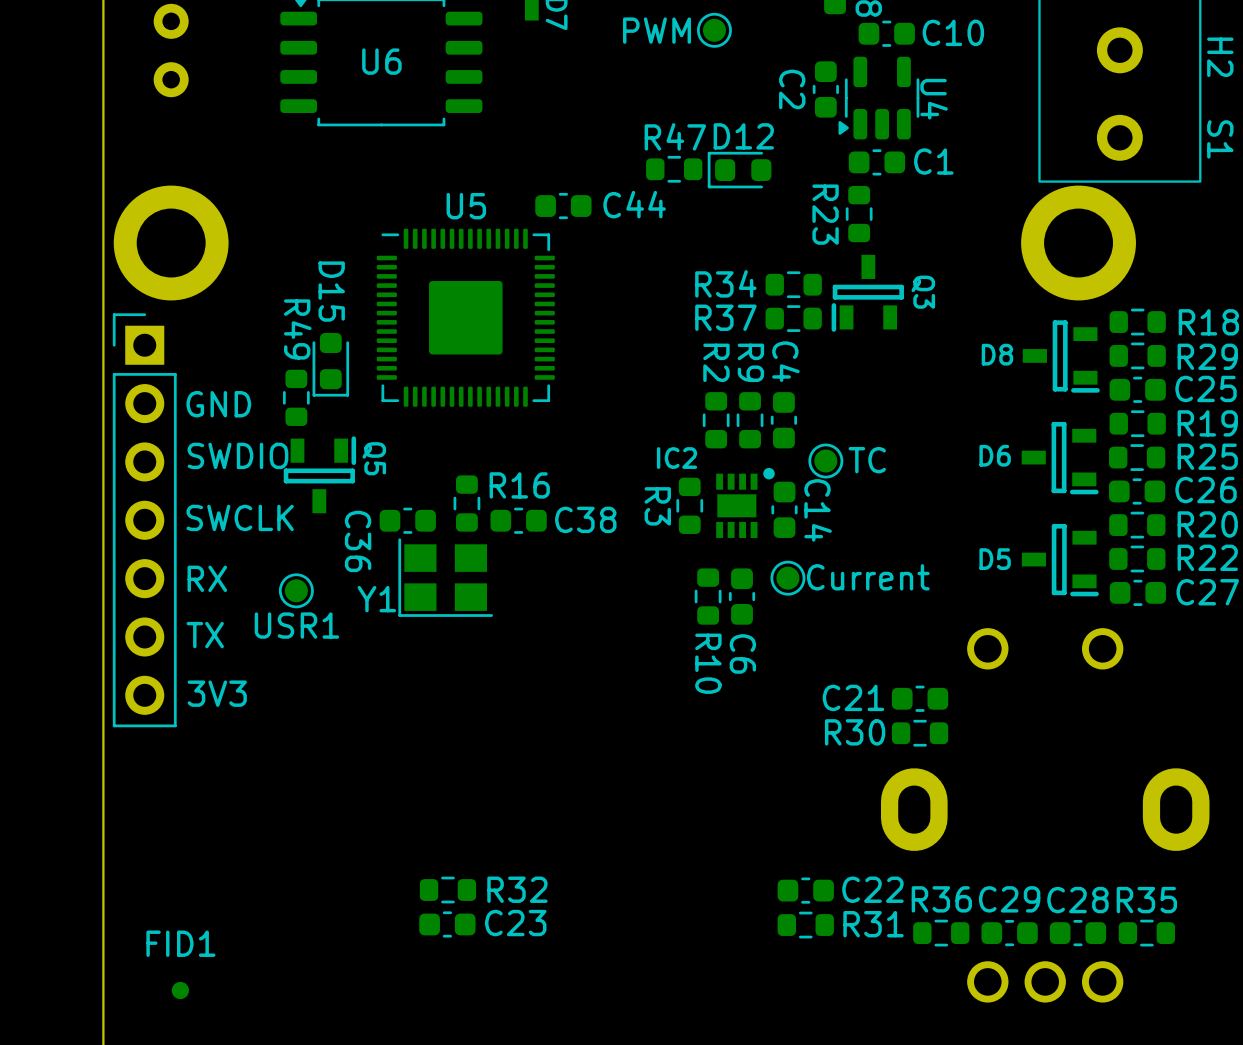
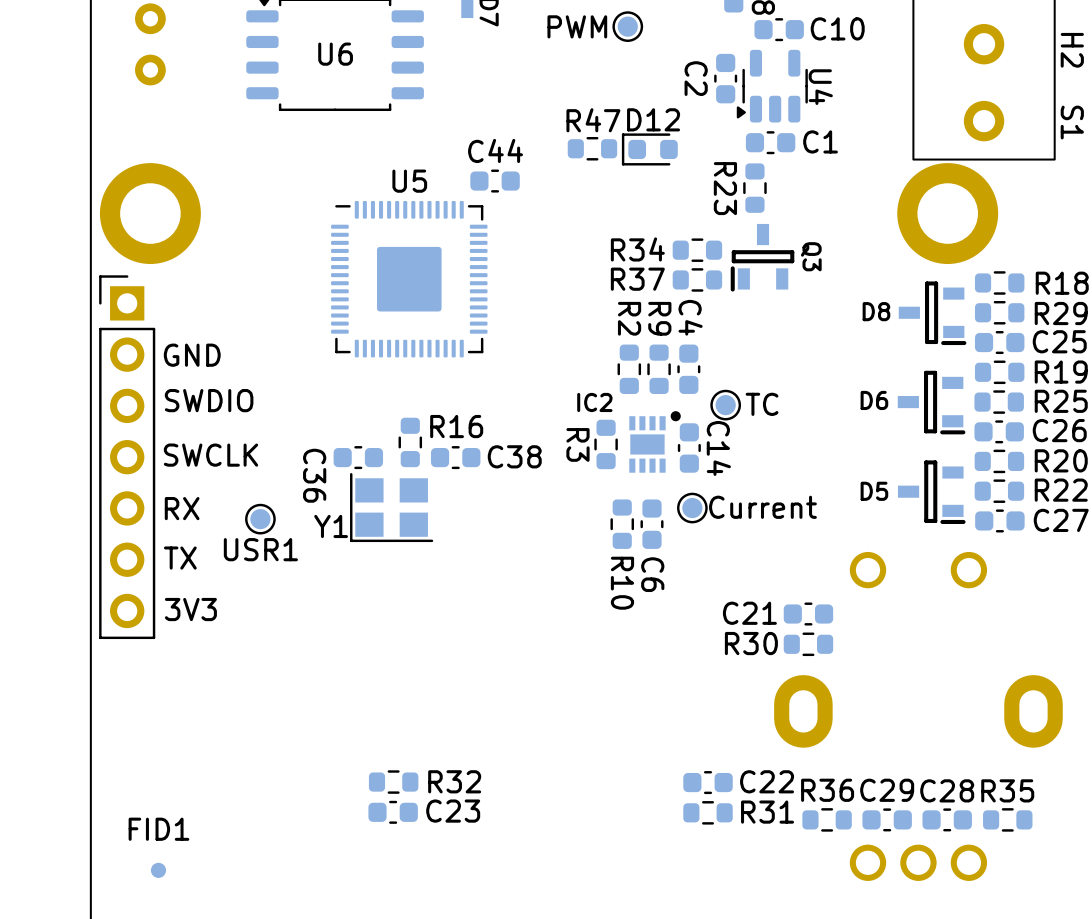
C44 name position: C44 (634, 204) -> C44 (495, 150)
D15: (330, 364) -> none
R49: (296, 397) -> none
Q5: (319, 474) -> none

